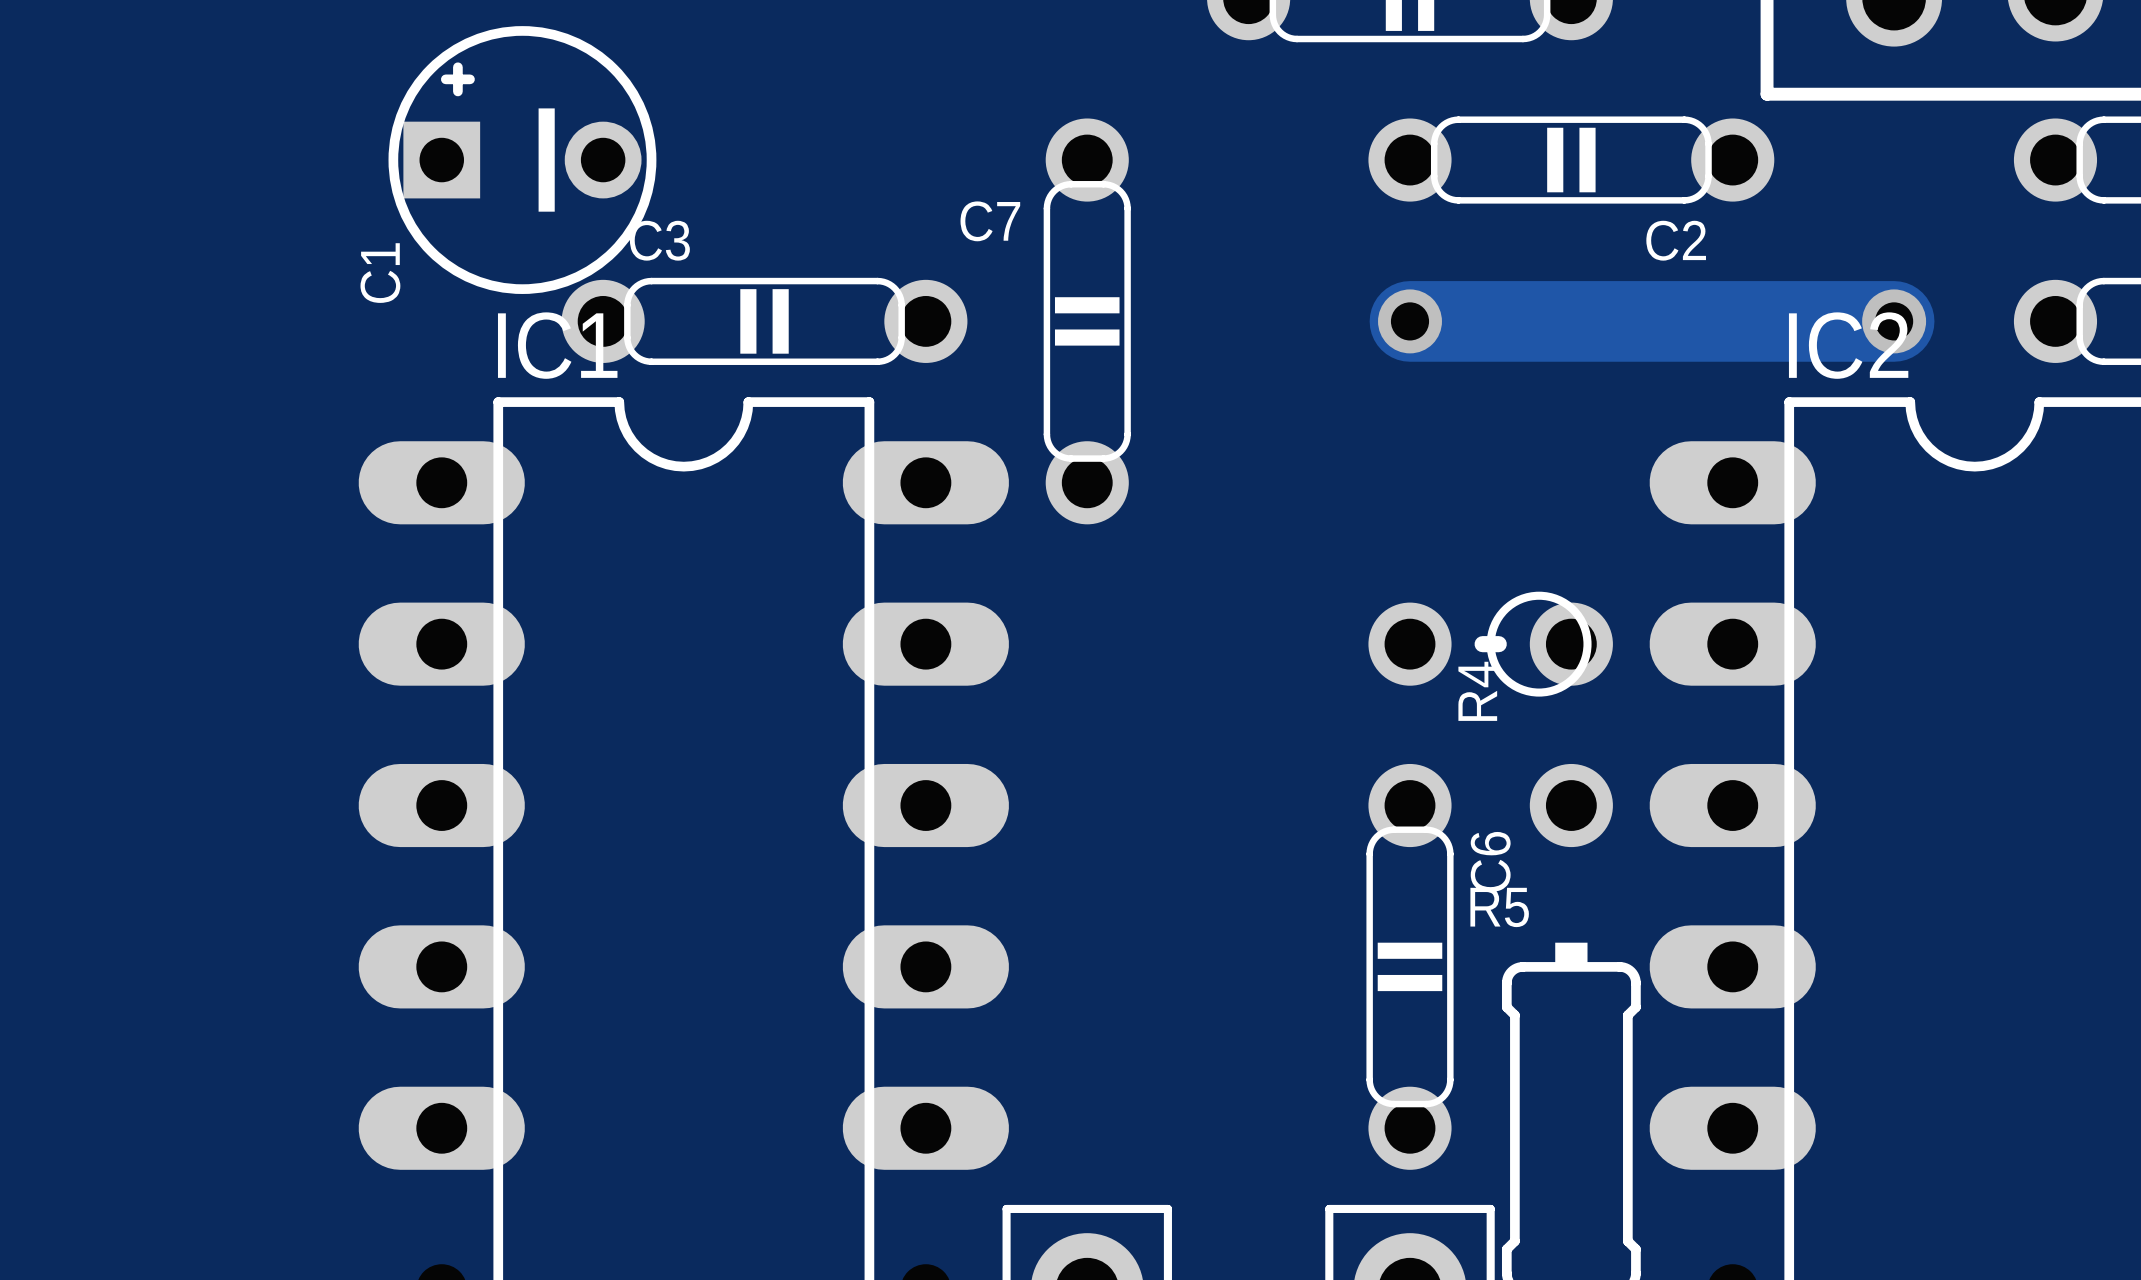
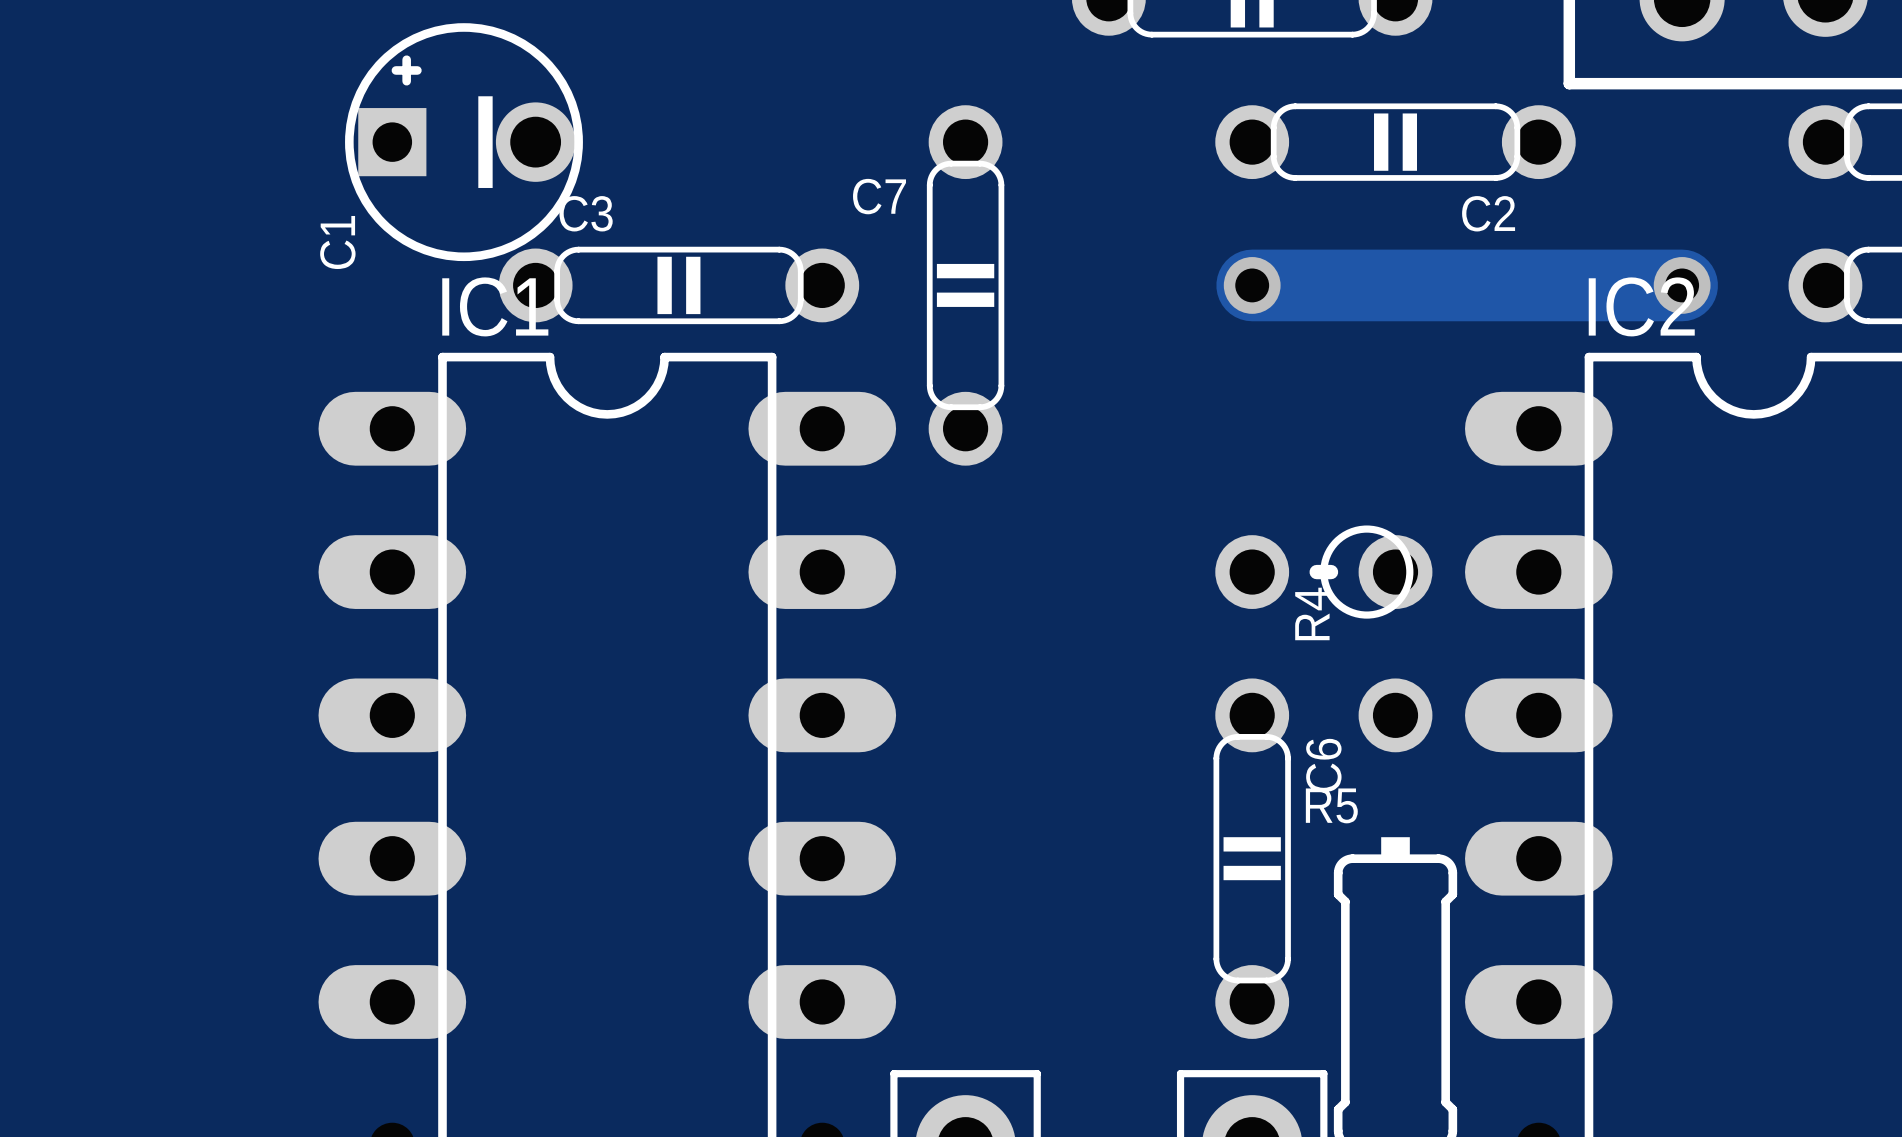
C1 footprint: [388, 26, 657, 294] -> [345, 23, 583, 262]

